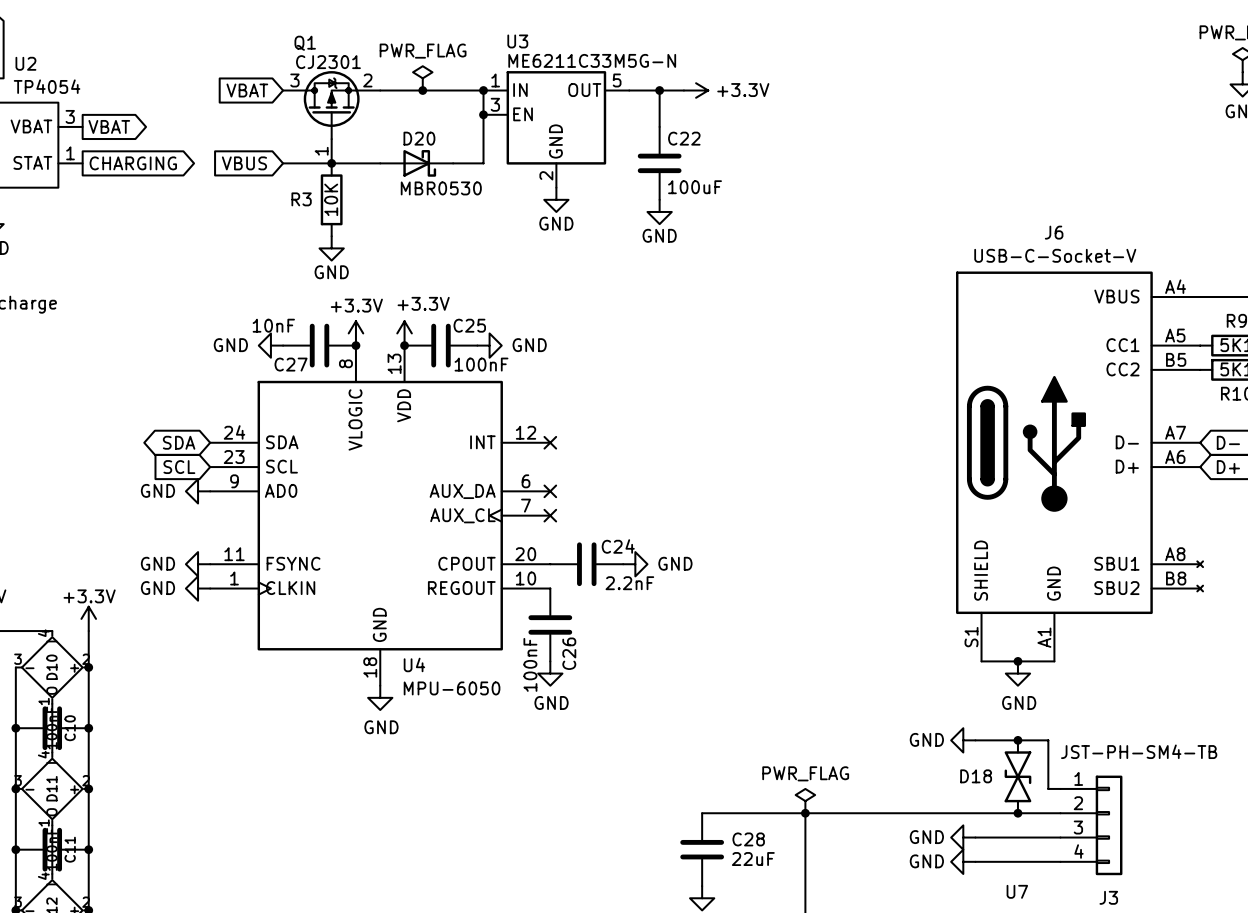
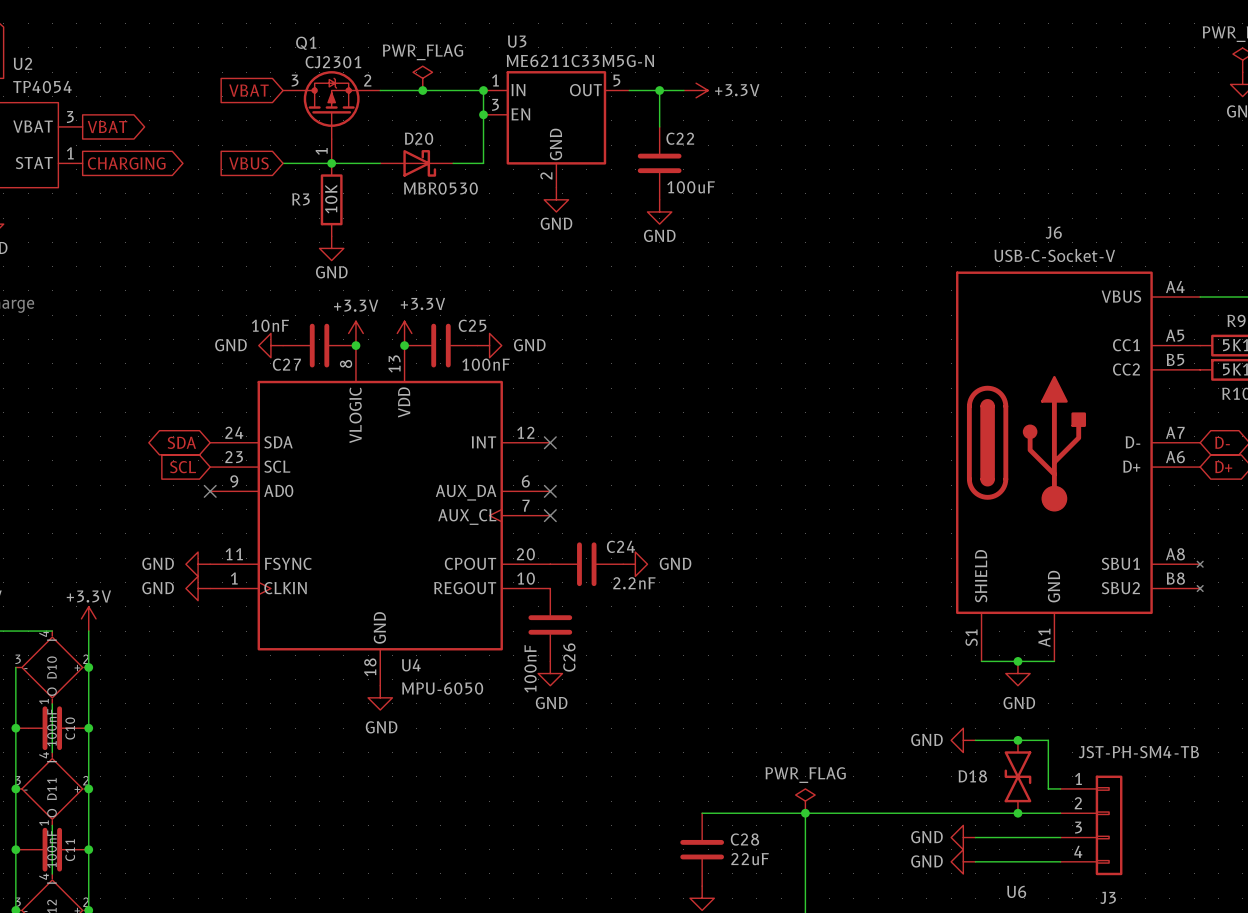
power symbol: GND (198, 491) -> none
no-connect mark: none -> (210, 491)
U7 name: U7 (1017, 891) -> U6 (1016, 891)

